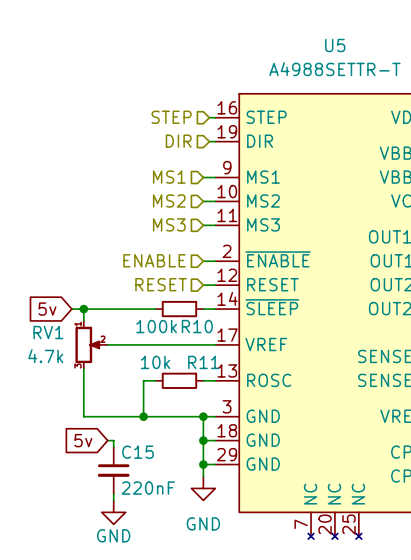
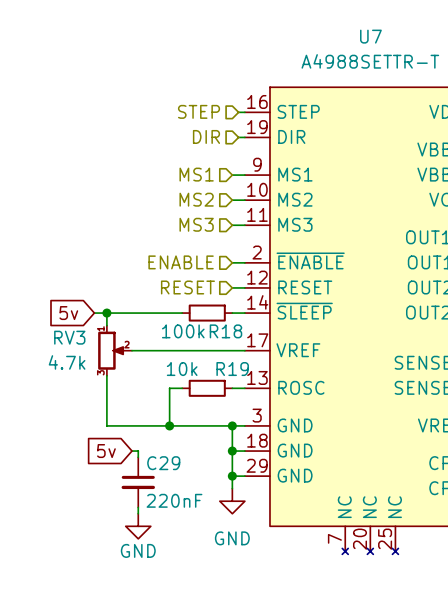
U5 name: U5 (335, 45) -> U7 (370, 36)
R10 name: R10 (197, 326) -> R18 (225, 331)
RV1 name: RV1 (48, 332) -> RV3 (69, 337)
R11 name: R11 (203, 362) -> R19 (232, 369)
C15 name: C15 (137, 452) -> C29 (163, 463)

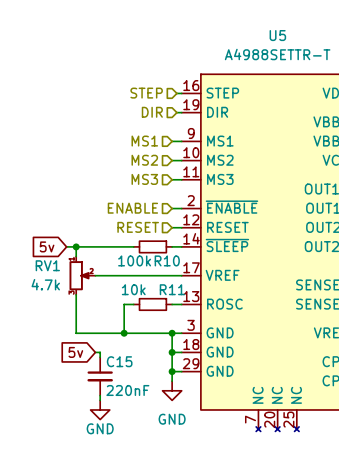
U7 name: U7 (370, 36) -> U5 (277, 35)
R18 name: R18 (225, 331) -> R10 (167, 260)
RV3 name: RV3 (69, 337) -> RV1 (47, 265)
R19 name: R19 (232, 369) -> R11 (172, 289)
C29 name: C29 (163, 463) -> C15 (119, 361)

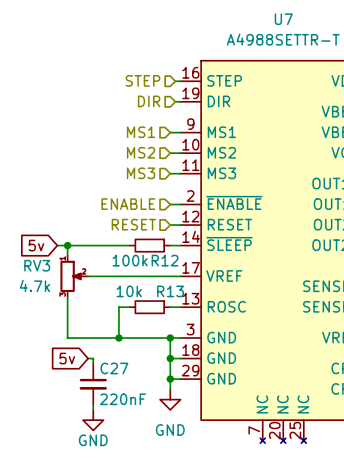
U5 name: U5 (277, 35) -> U7 (283, 19)
R10 name: R10 (167, 260) -> R12 (165, 260)
RV1 name: RV1 (47, 265) -> RV3 (37, 265)
R11 name: R11 (172, 289) -> R13 (170, 291)
C15 name: C15 (119, 361) -> C27 (114, 368)

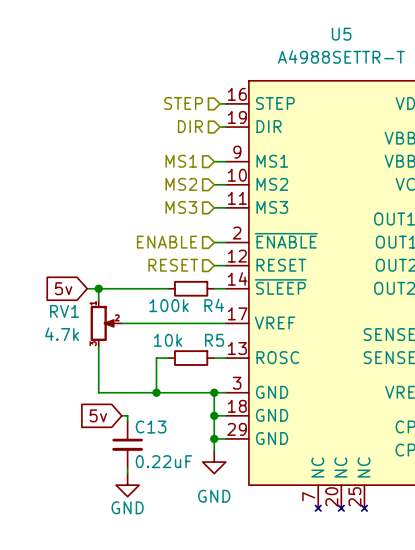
U7 name: U7 (283, 19) -> U5 (341, 34)
R12 name: R12 (165, 260) -> R4 (214, 305)
RV3 name: RV3 (37, 265) -> RV1 (64, 311)
R13 name: R13 (170, 291) -> R5 (214, 340)
C27 name: C27 (114, 368) -> C13 (151, 427)
C27 value: 220nF (122, 399) -> 0.22uF (164, 461)

